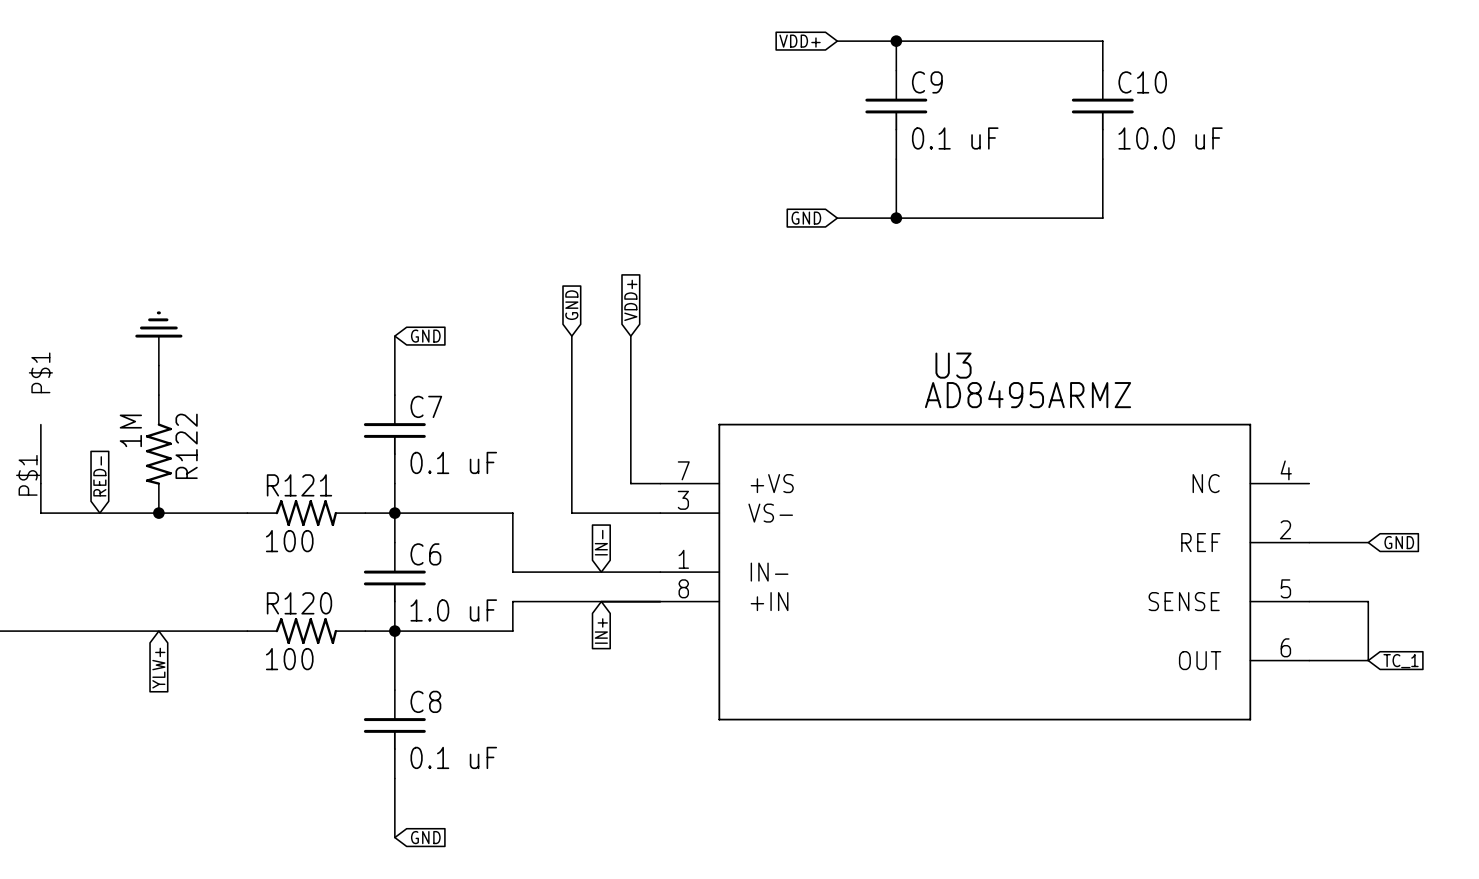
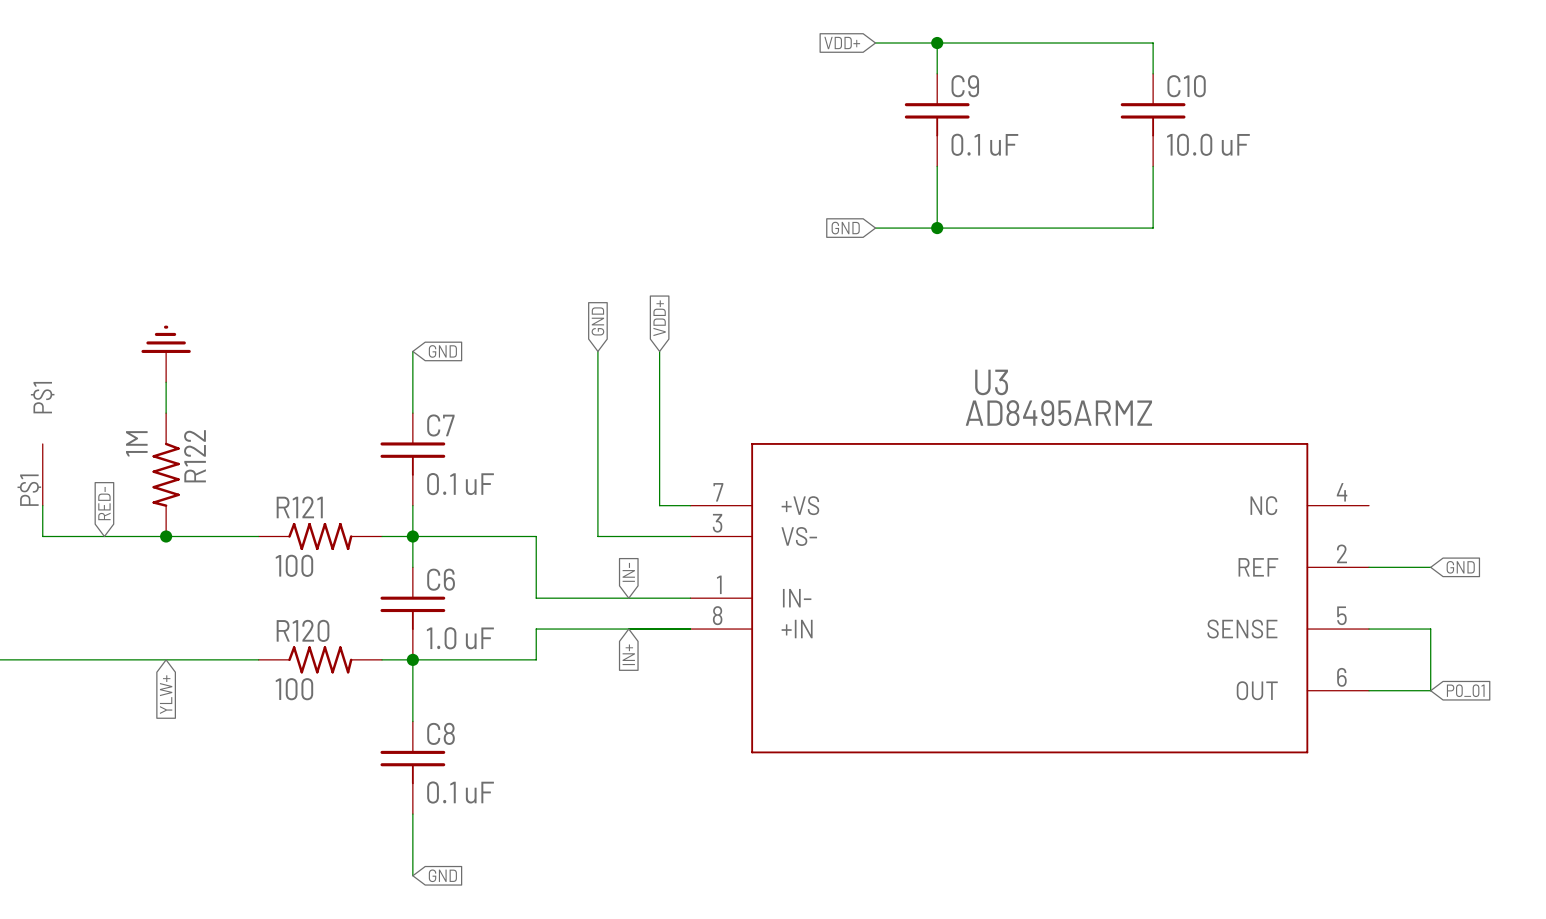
global label: TC_1 (1401, 661) -> P0_01 (1465, 690)

